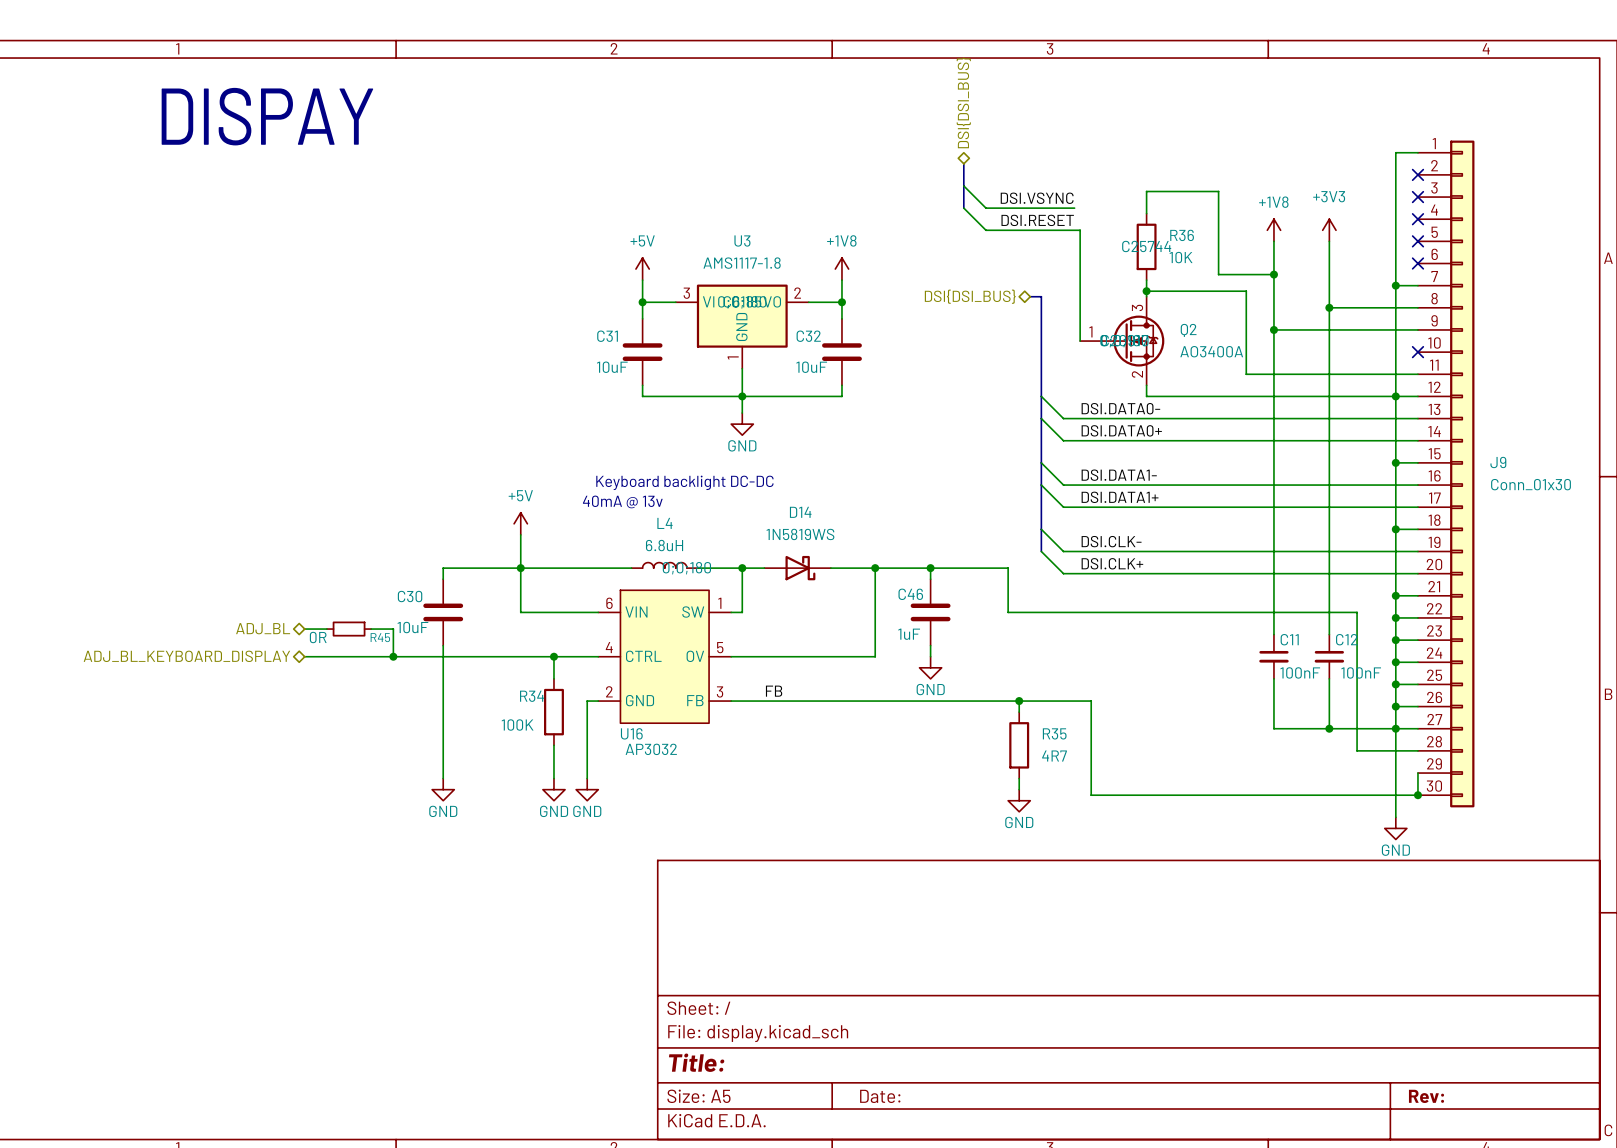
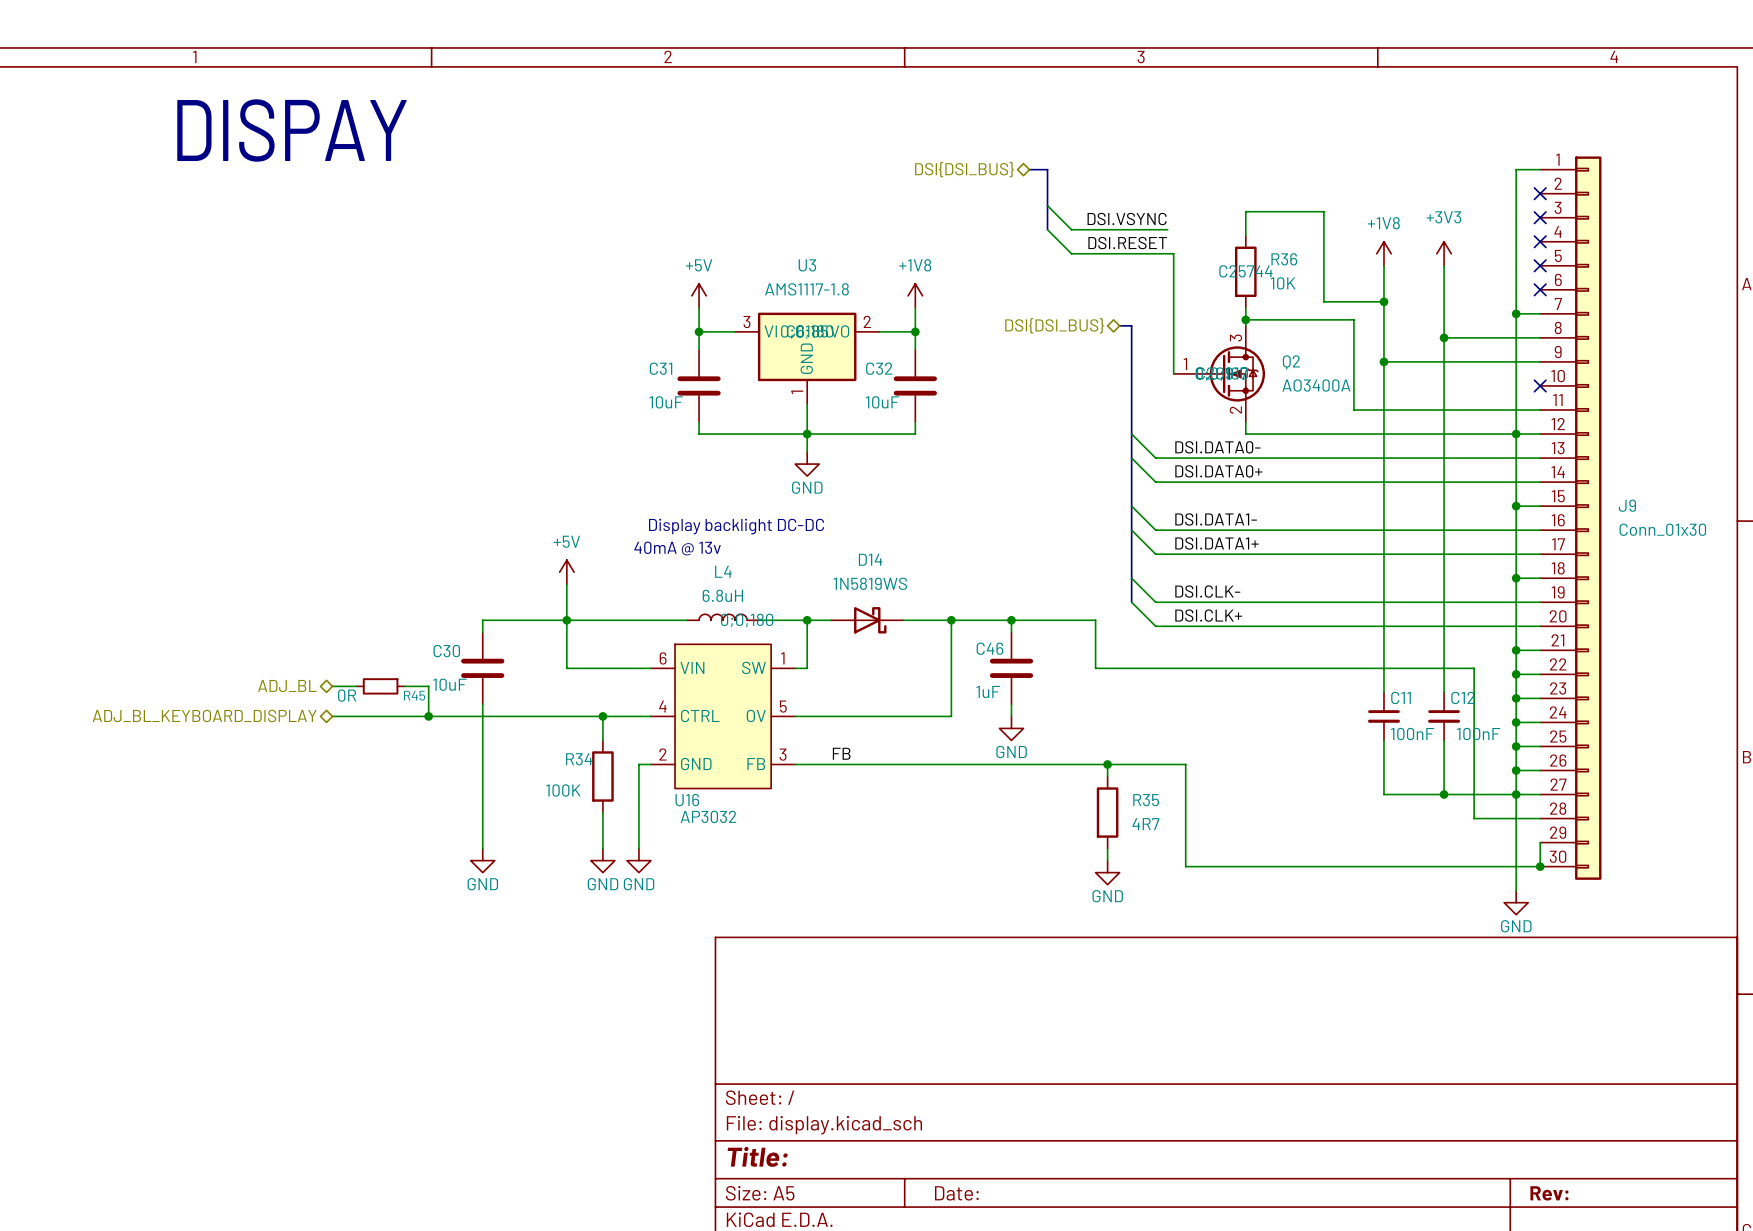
hierarchical label rotation: 0° (963, 102) -> 90° counterclockwise (964, 169)
bus: none -> (1029, 169) (1047, 169) (1047, 181)
text: Keyboard backlight DC-DC (684, 482) -> Display backlight DC-DC (736, 526)

